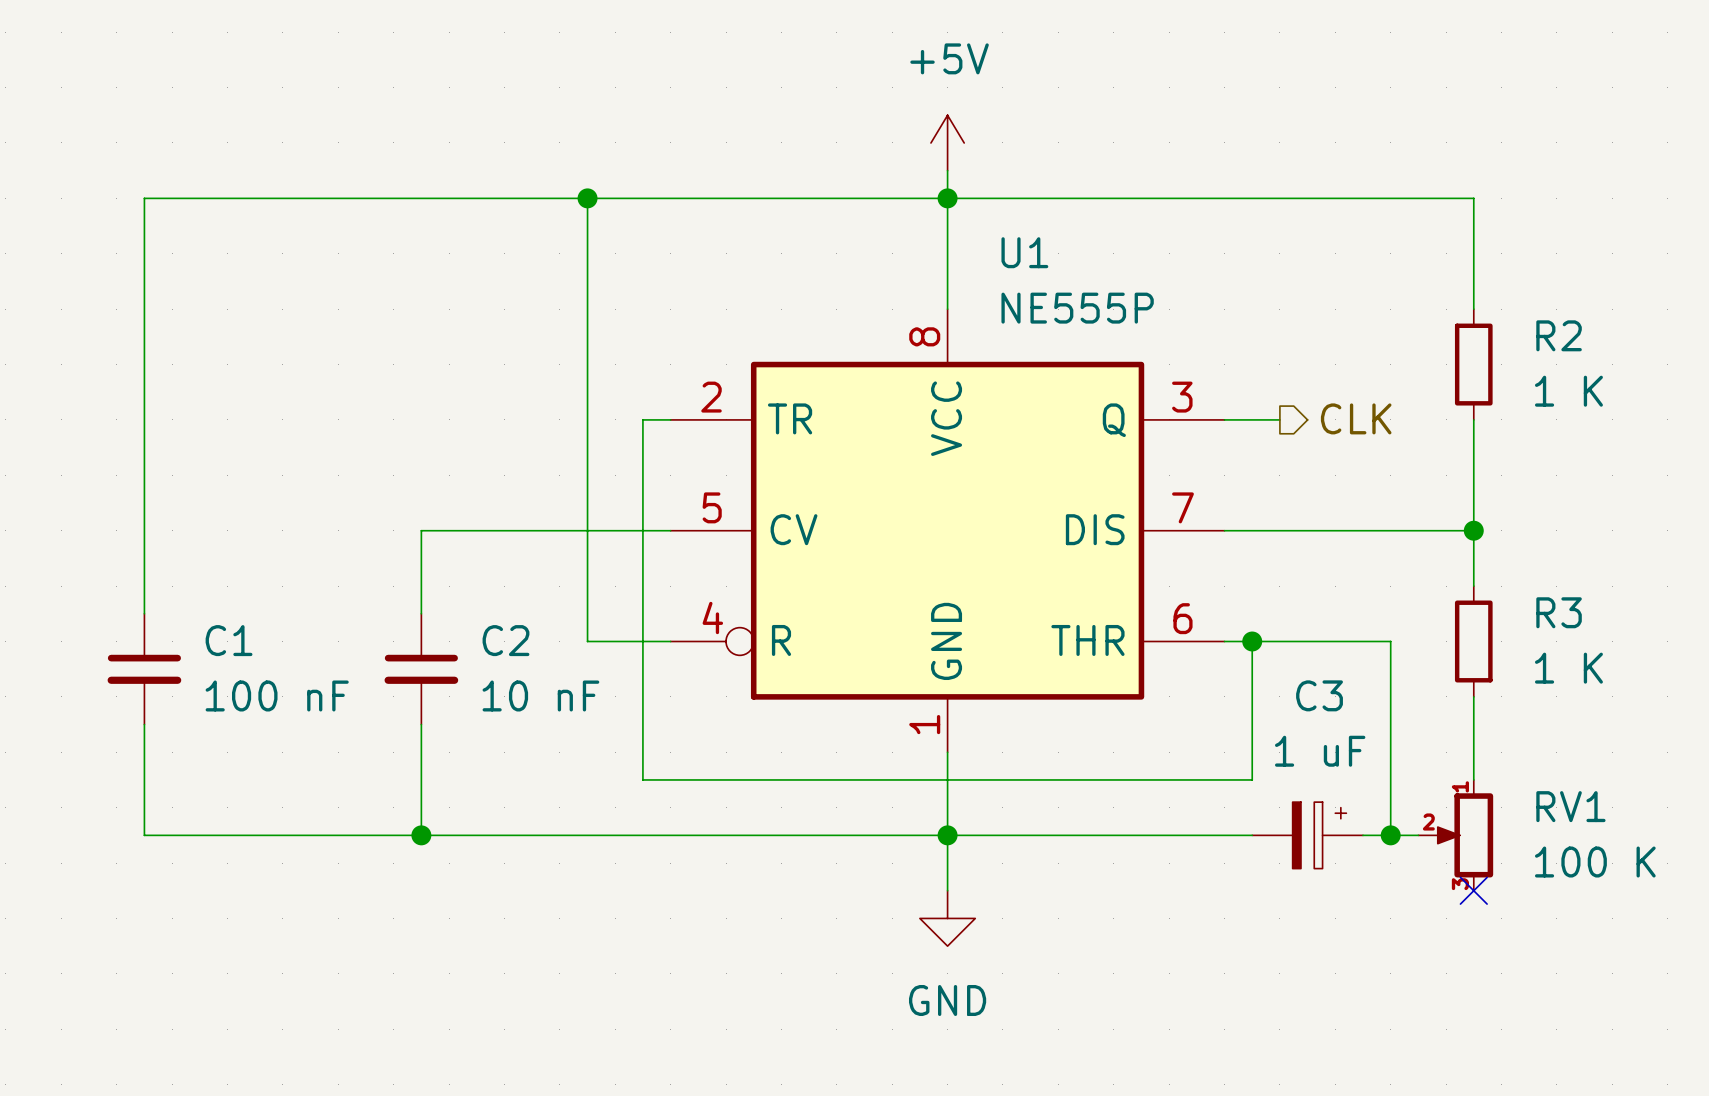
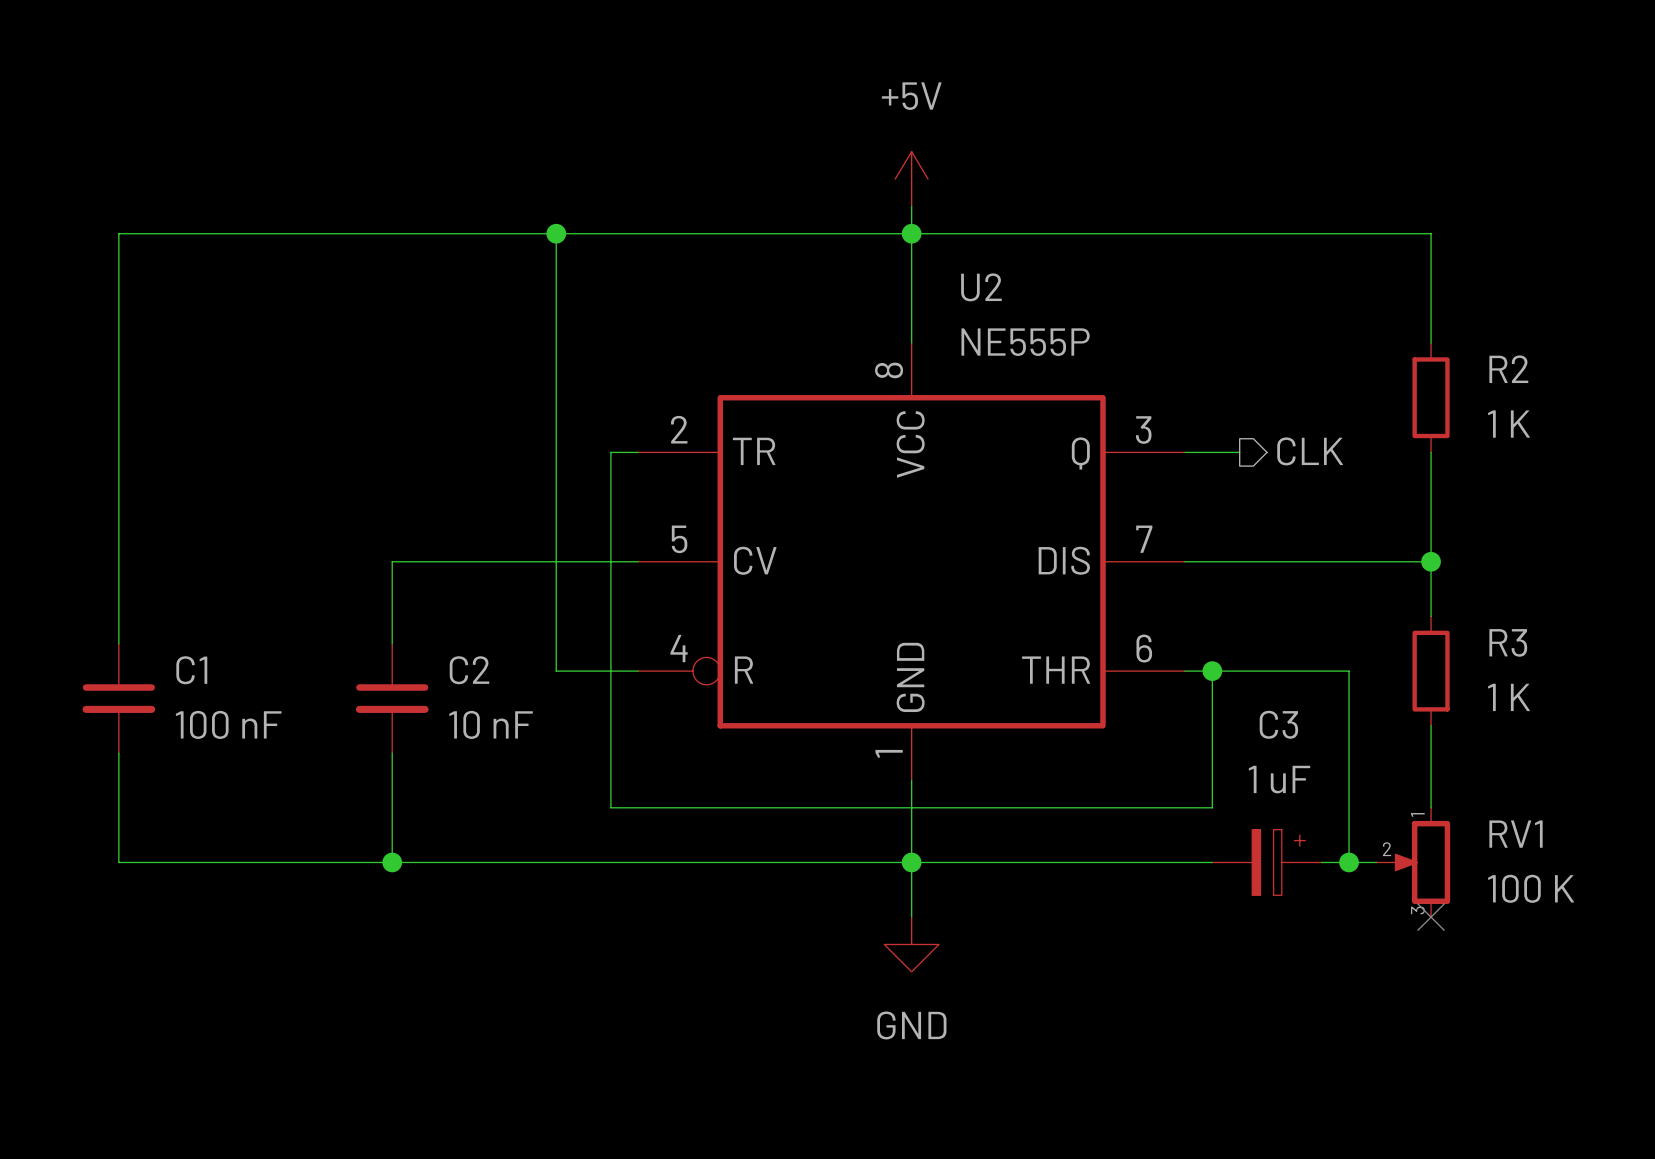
U1 name: U1 (1024, 252) -> U2 (981, 287)

